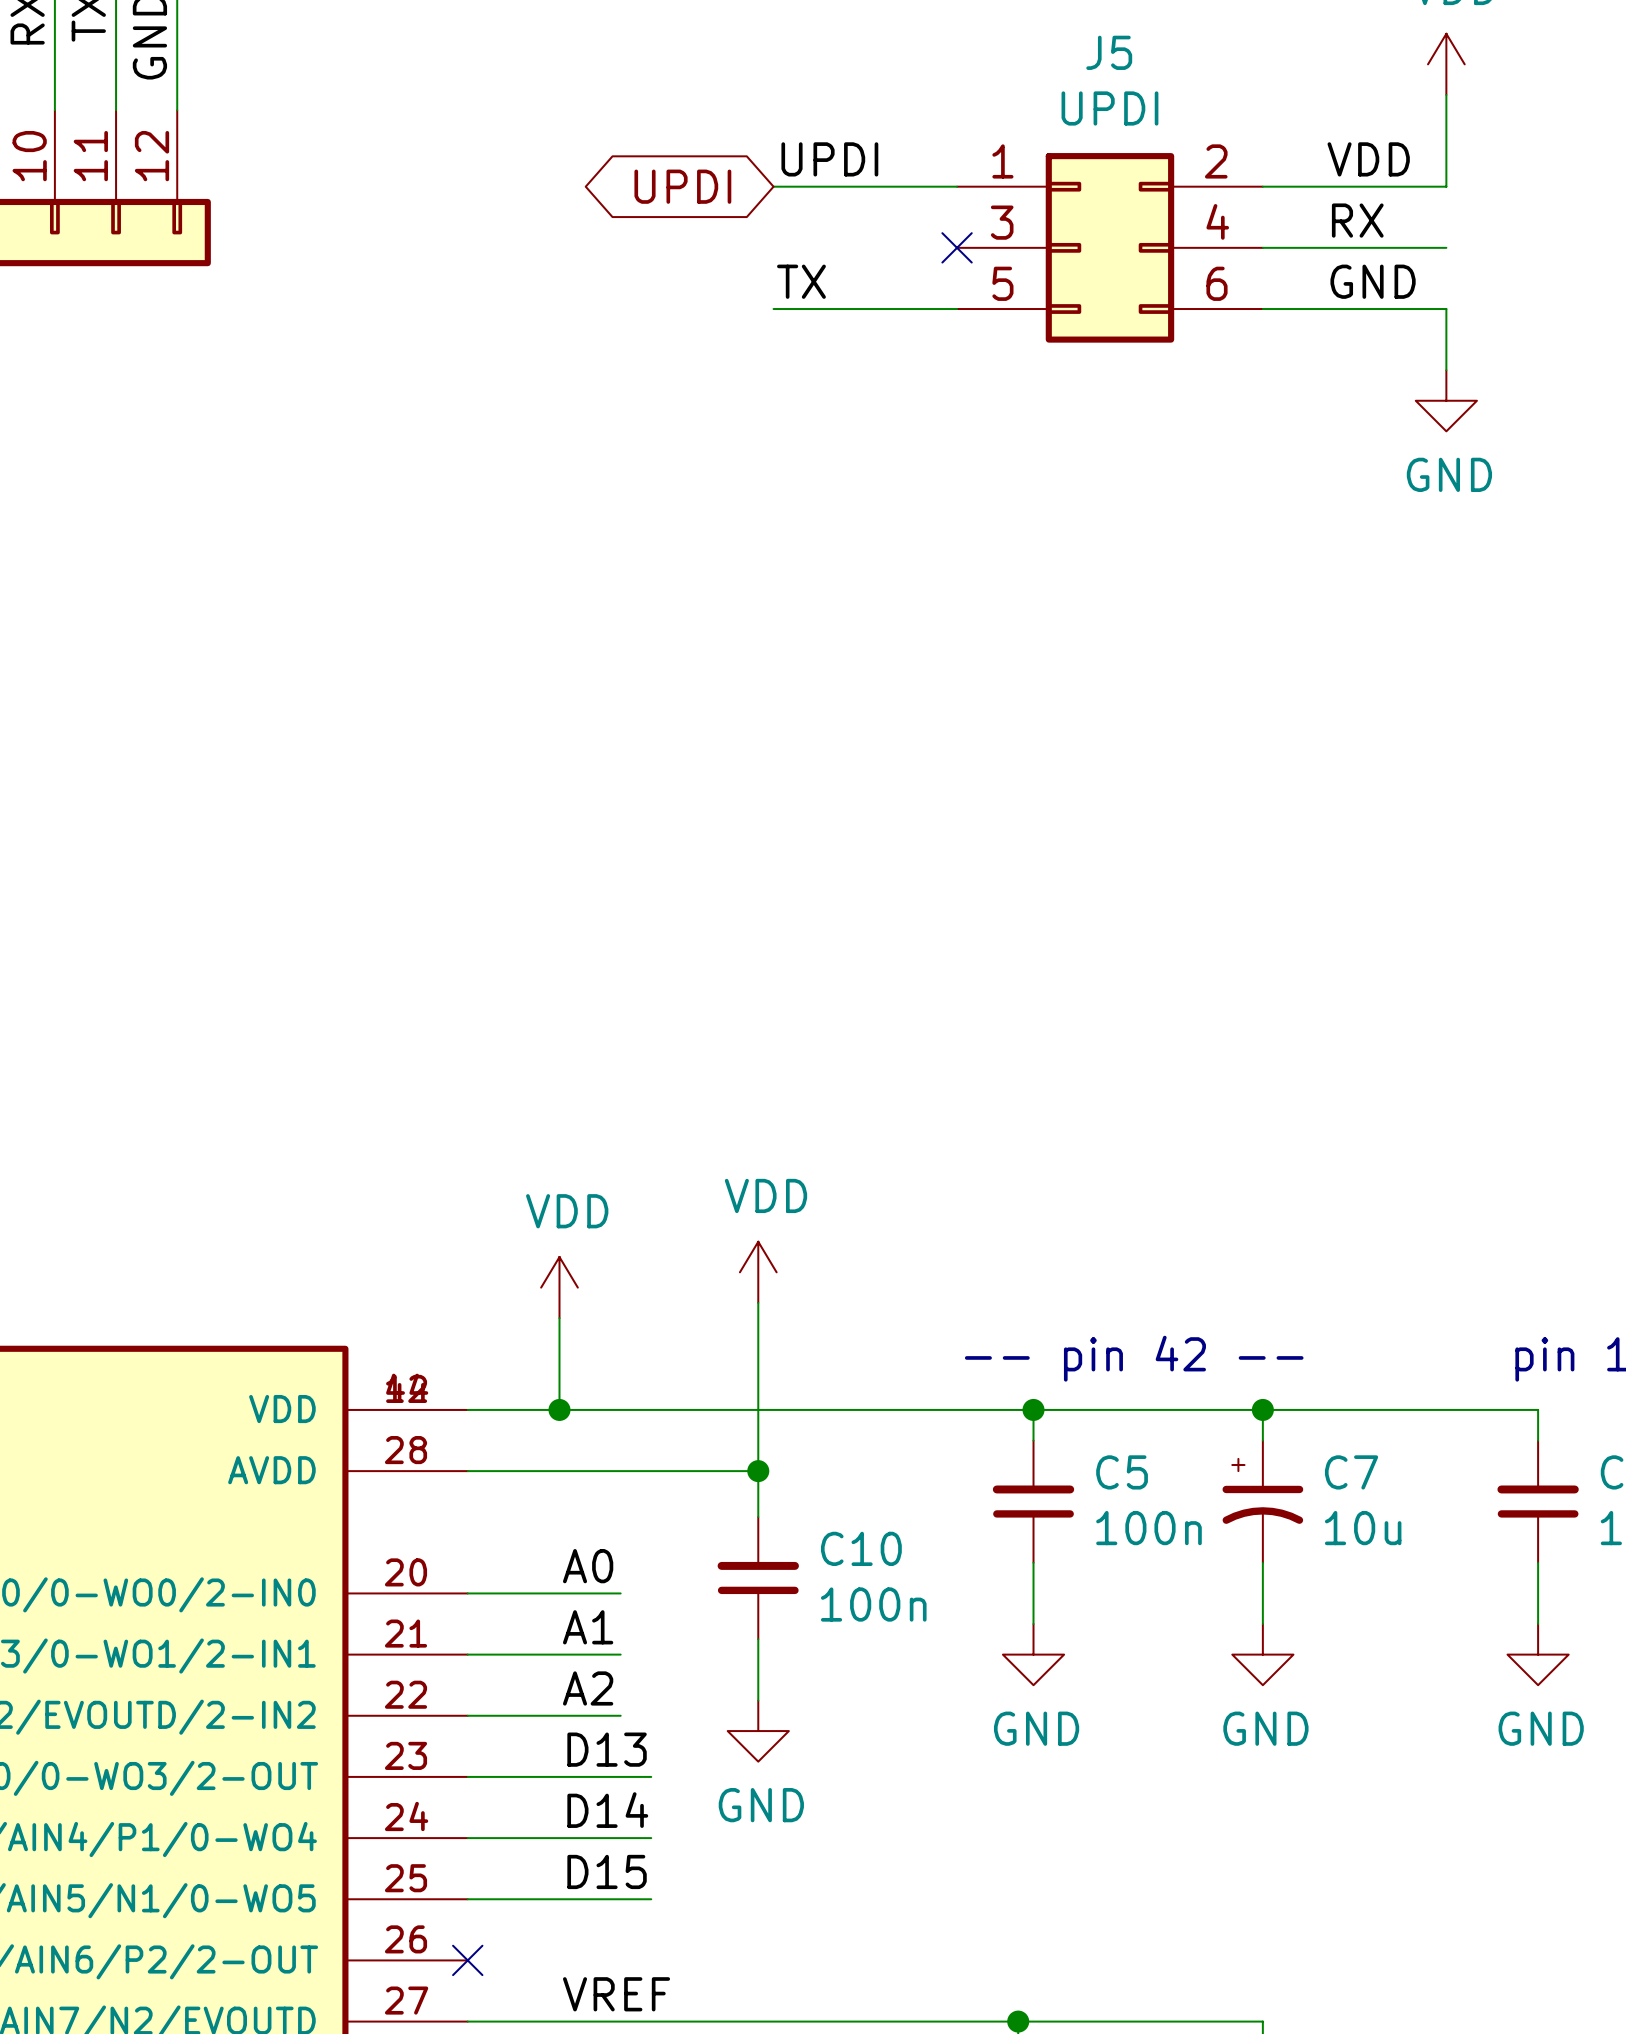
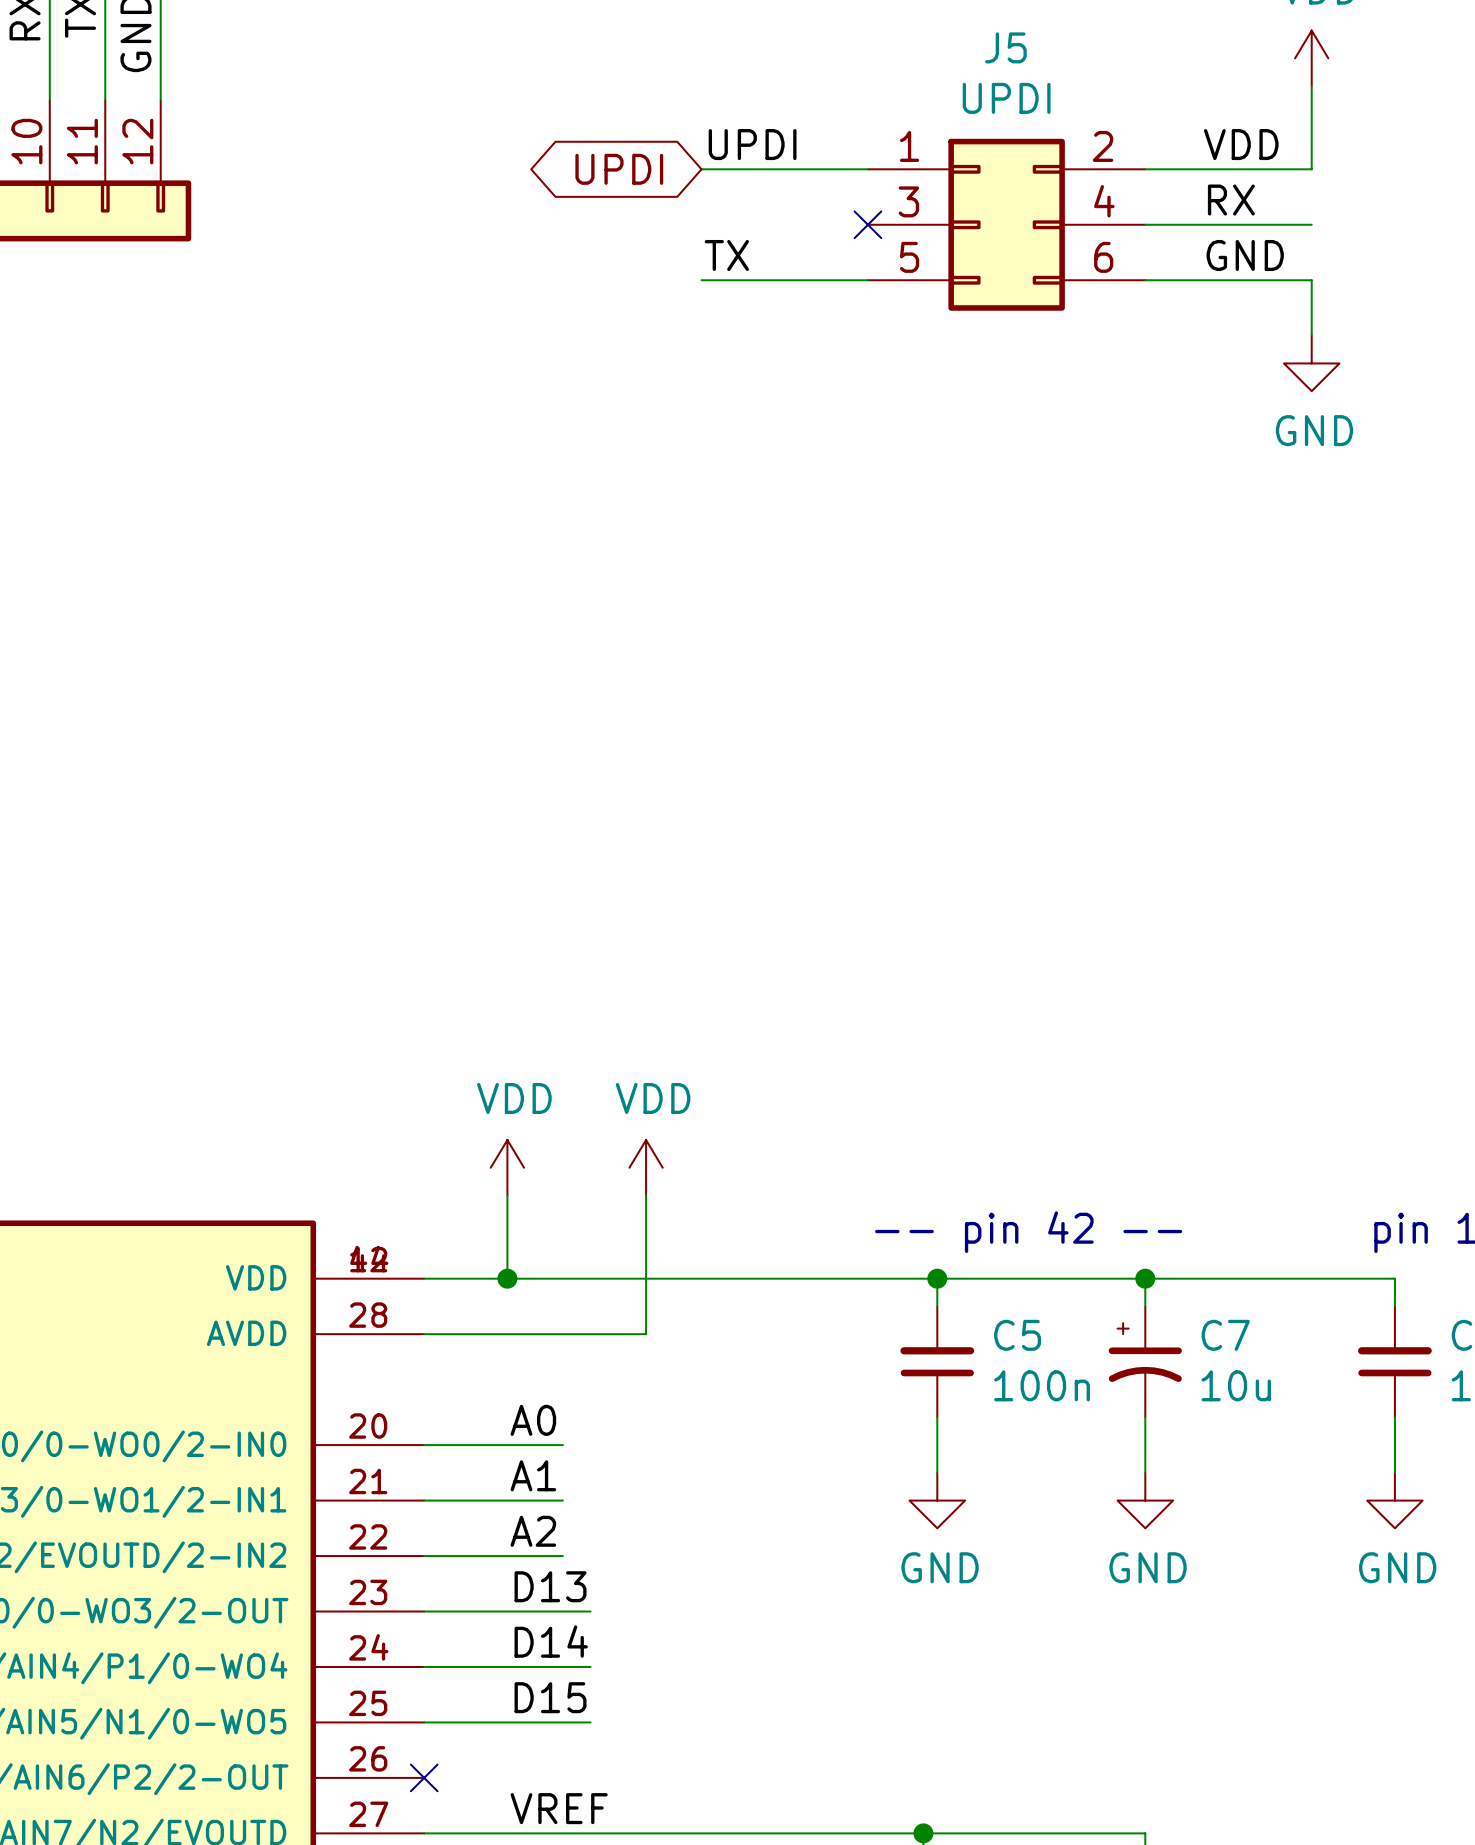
power symbol position: VDD (758, 1272) -> VDD (646, 1167)
wire: (758, 1302) (758, 1516) -> none
wire: (712, 1471) (758, 1471) -> (646, 1334) (646, 1195)
junction: (758, 1471) -> none
C10: 100n (758, 1578) -> none
wire: (758, 1639) (758, 1700) -> none
power symbol: GND (758, 1731) -> none

